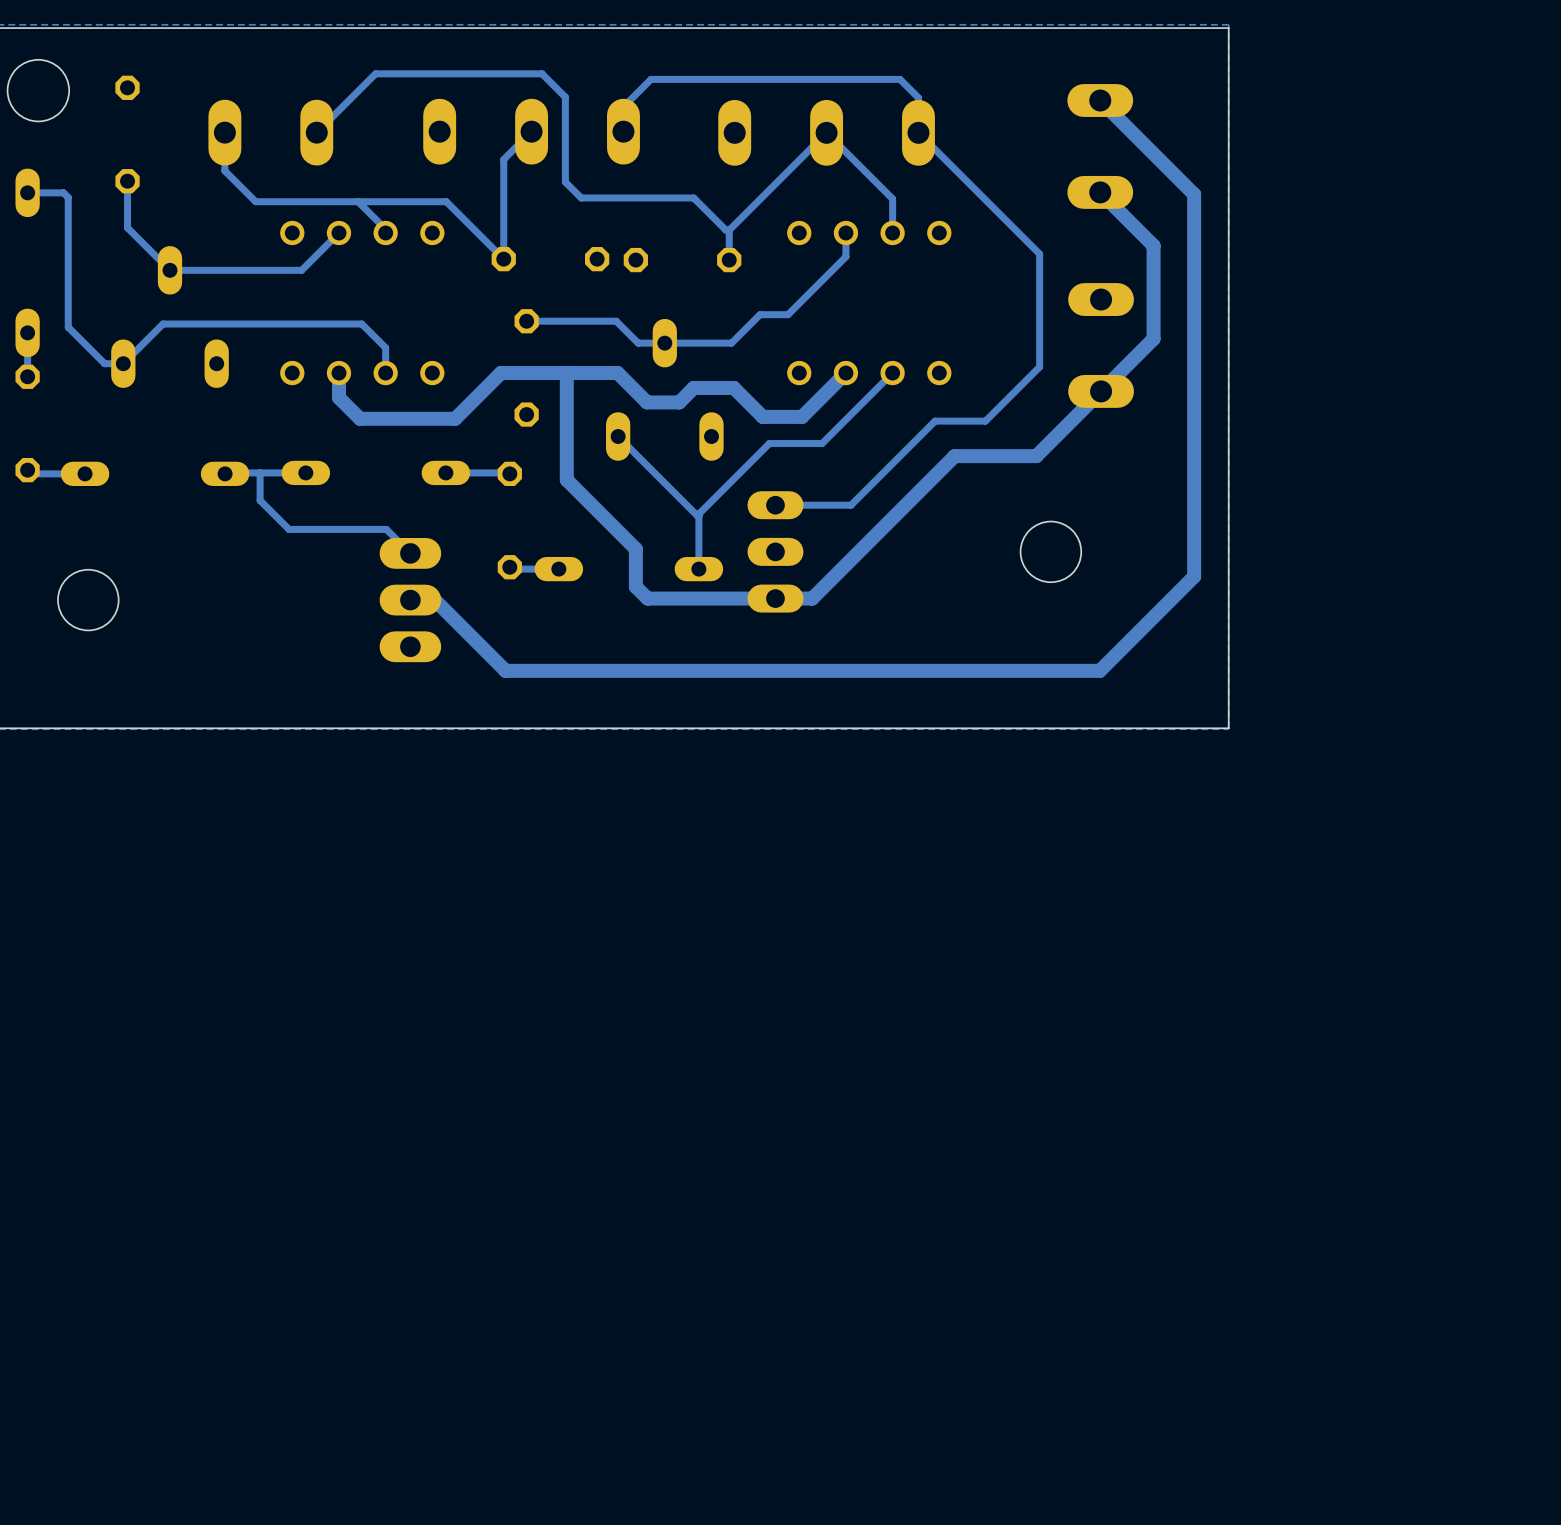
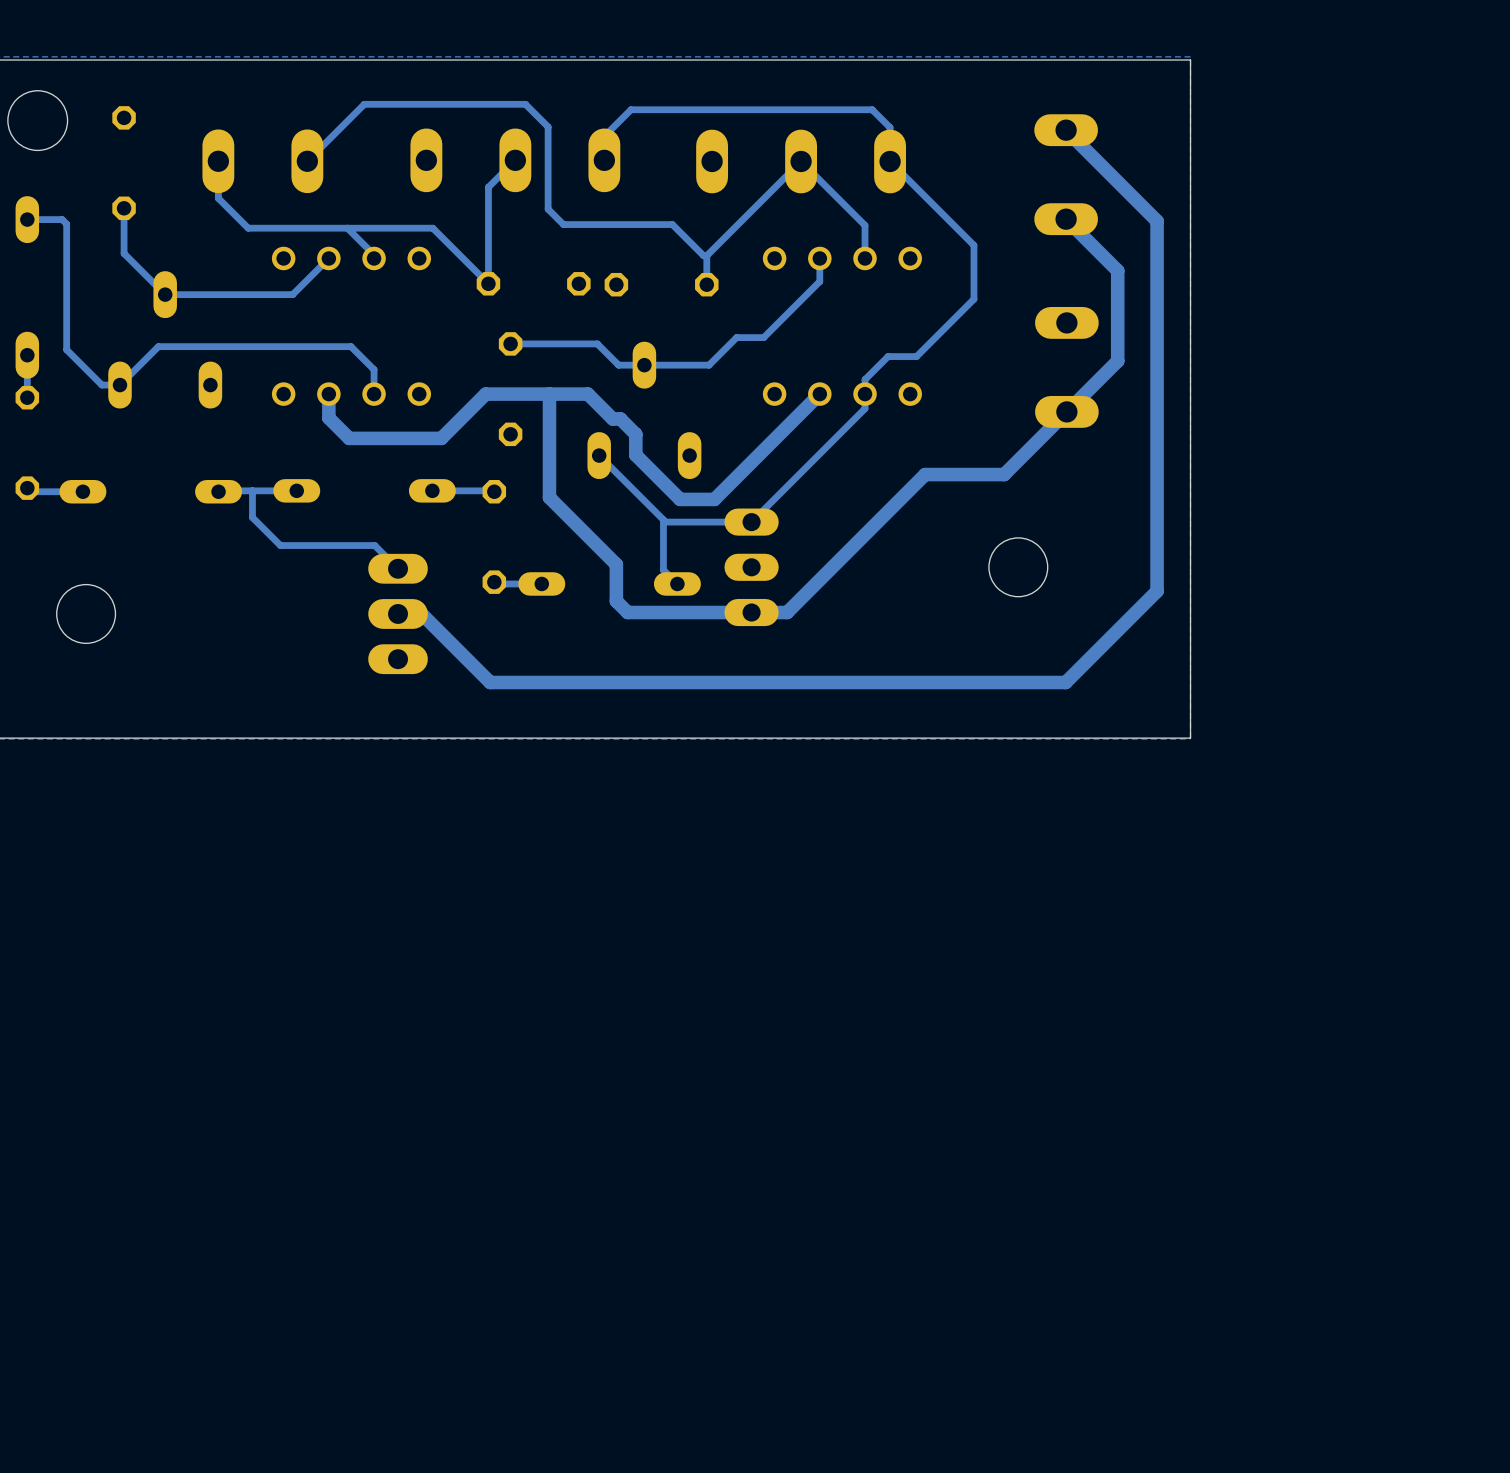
bottom track: (1005, 219) (1039, 254) (1039, 366) (985, 421) (935, 421) (851, 505) (775, 505) -> (973, 245) (973, 299) (916, 356) (888, 356) (865, 379) (865, 408) (751, 522) (665, 522)
bottom track: (606, 373) (617, 373) (647, 402) (679, 402) (693, 387) (733, 387) (762, 416) (802, 416) -> (587, 394) (612, 418) (620, 418) (635, 434) (635, 455) (680, 499) (714, 499) (777, 436)
bottom track: (892, 373) (822, 443) (769, 443) (698, 514) (698, 569) -> (663, 519) (663, 570) (677, 583)
bottom track: (686, 505) (698, 516) -> none

